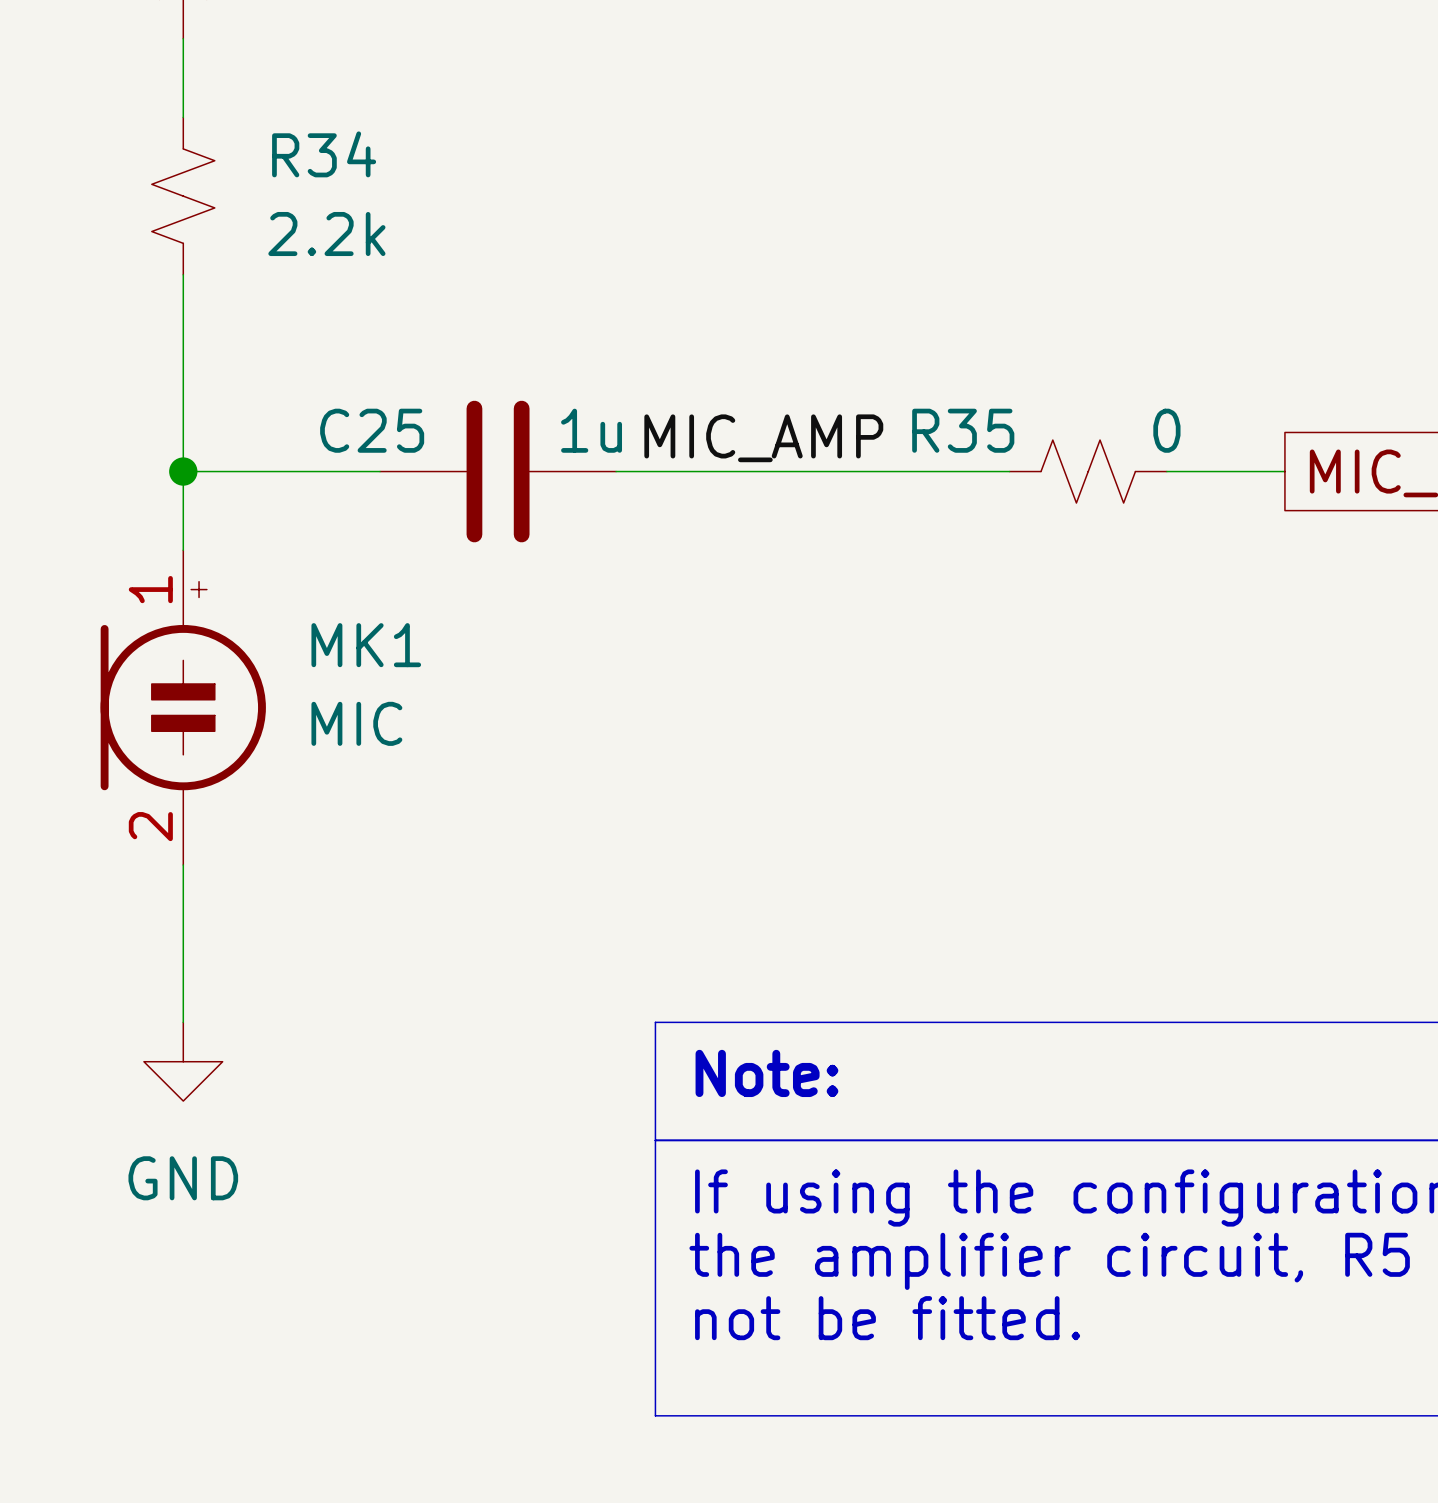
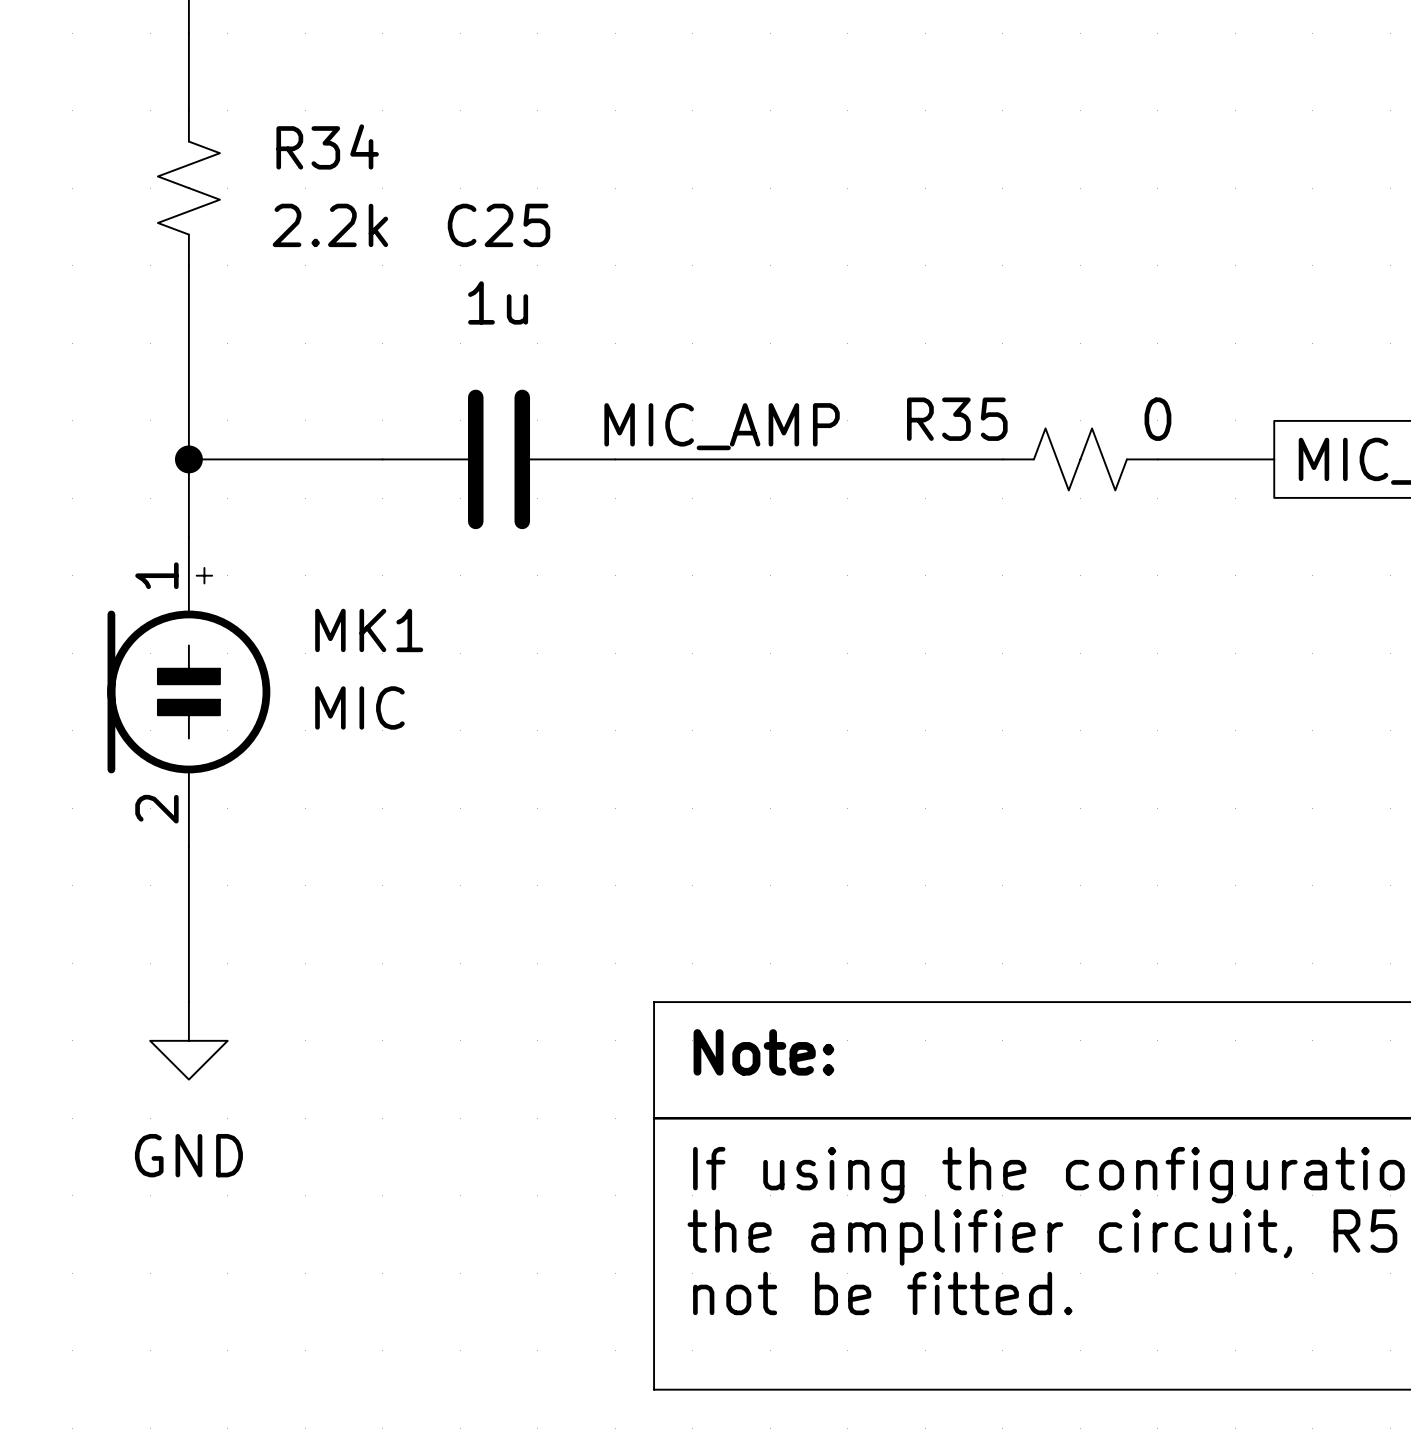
C25 name position: C25 (372, 430) -> C25 (499, 225)
C25 value position: 1u (591, 430) -> 1u (498, 302)
label position: MIC_AMP (763, 438) -> MIC_AMP (722, 426)

